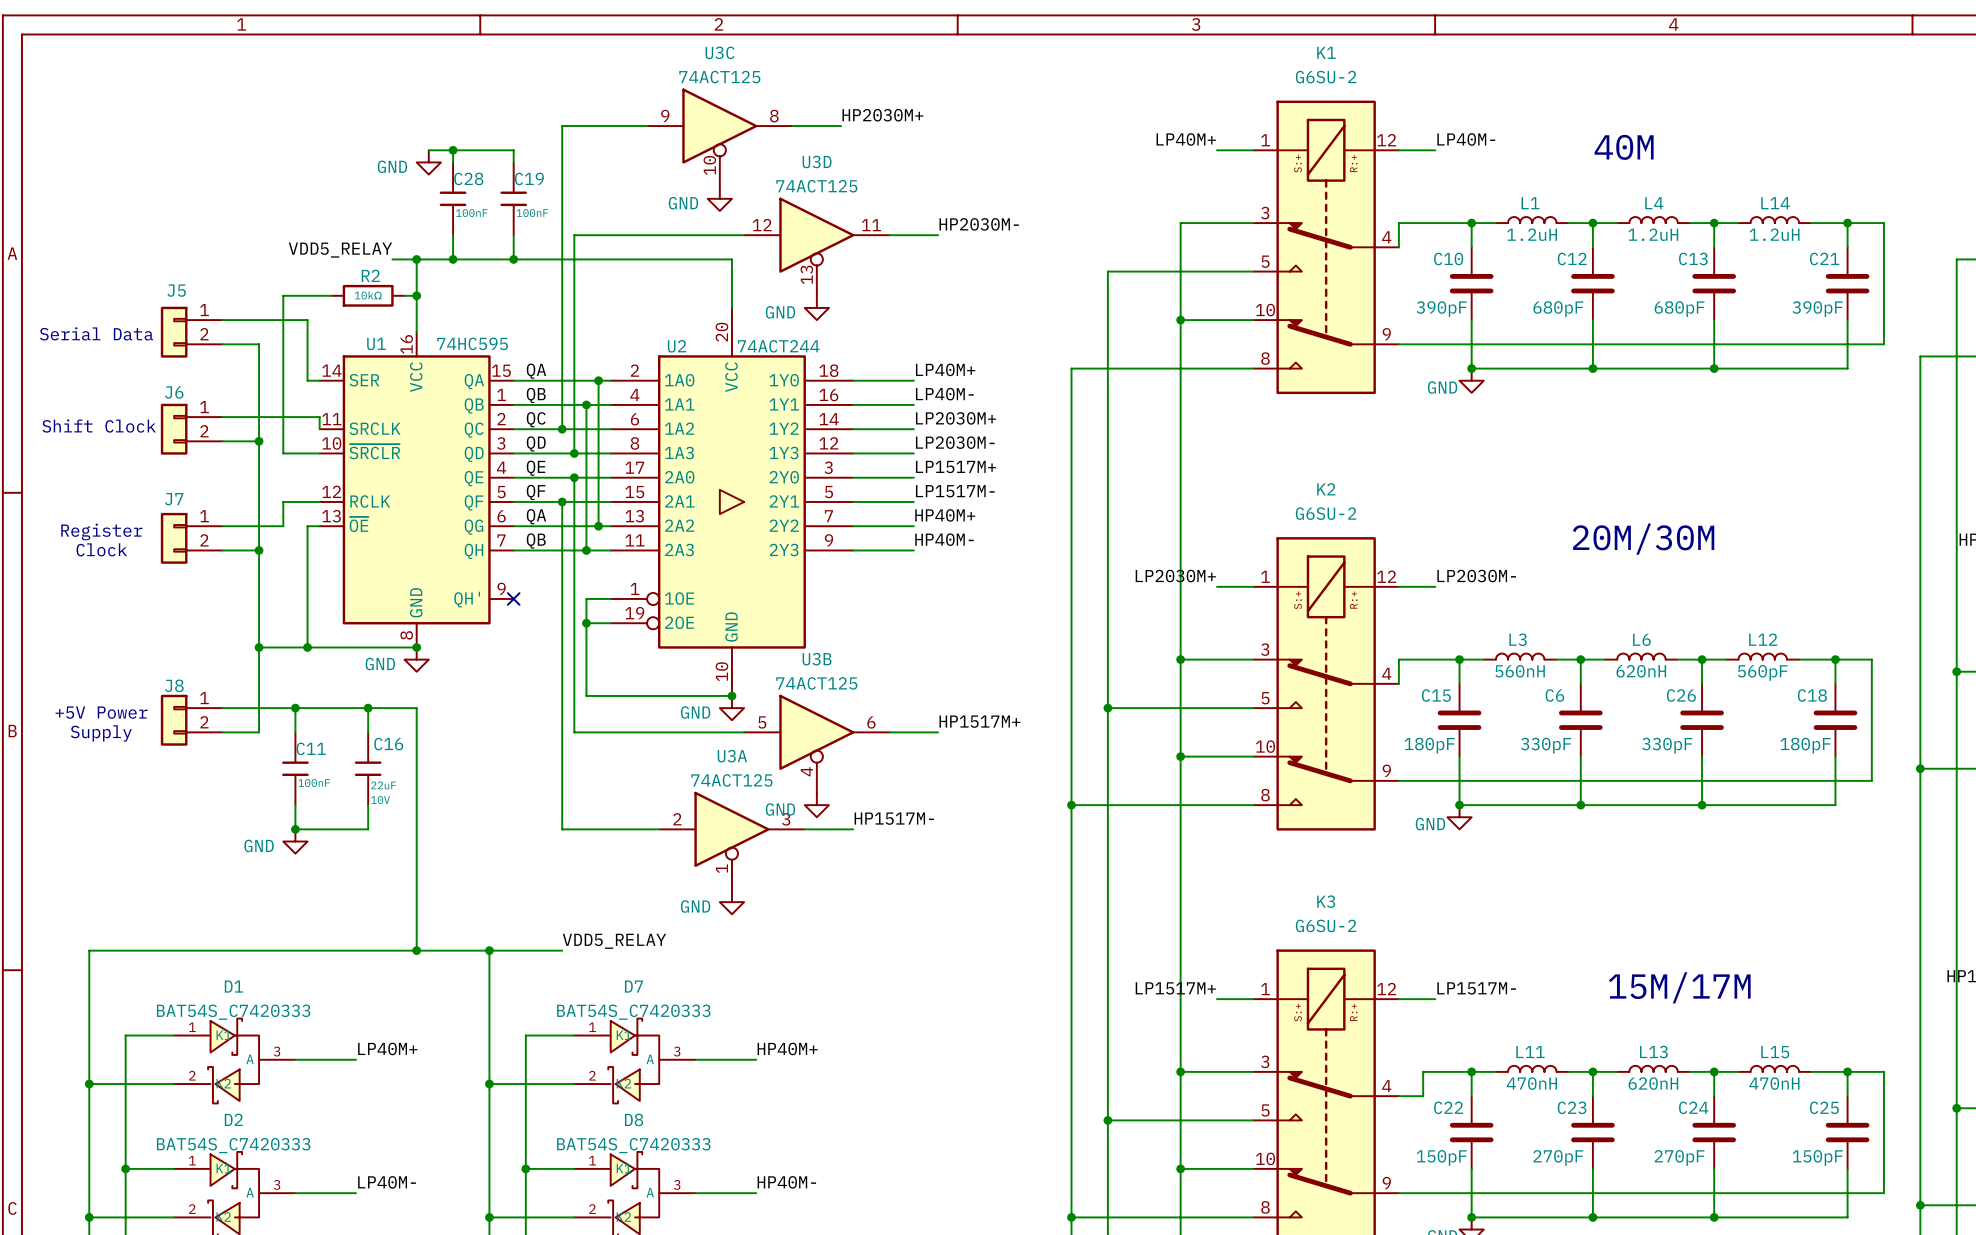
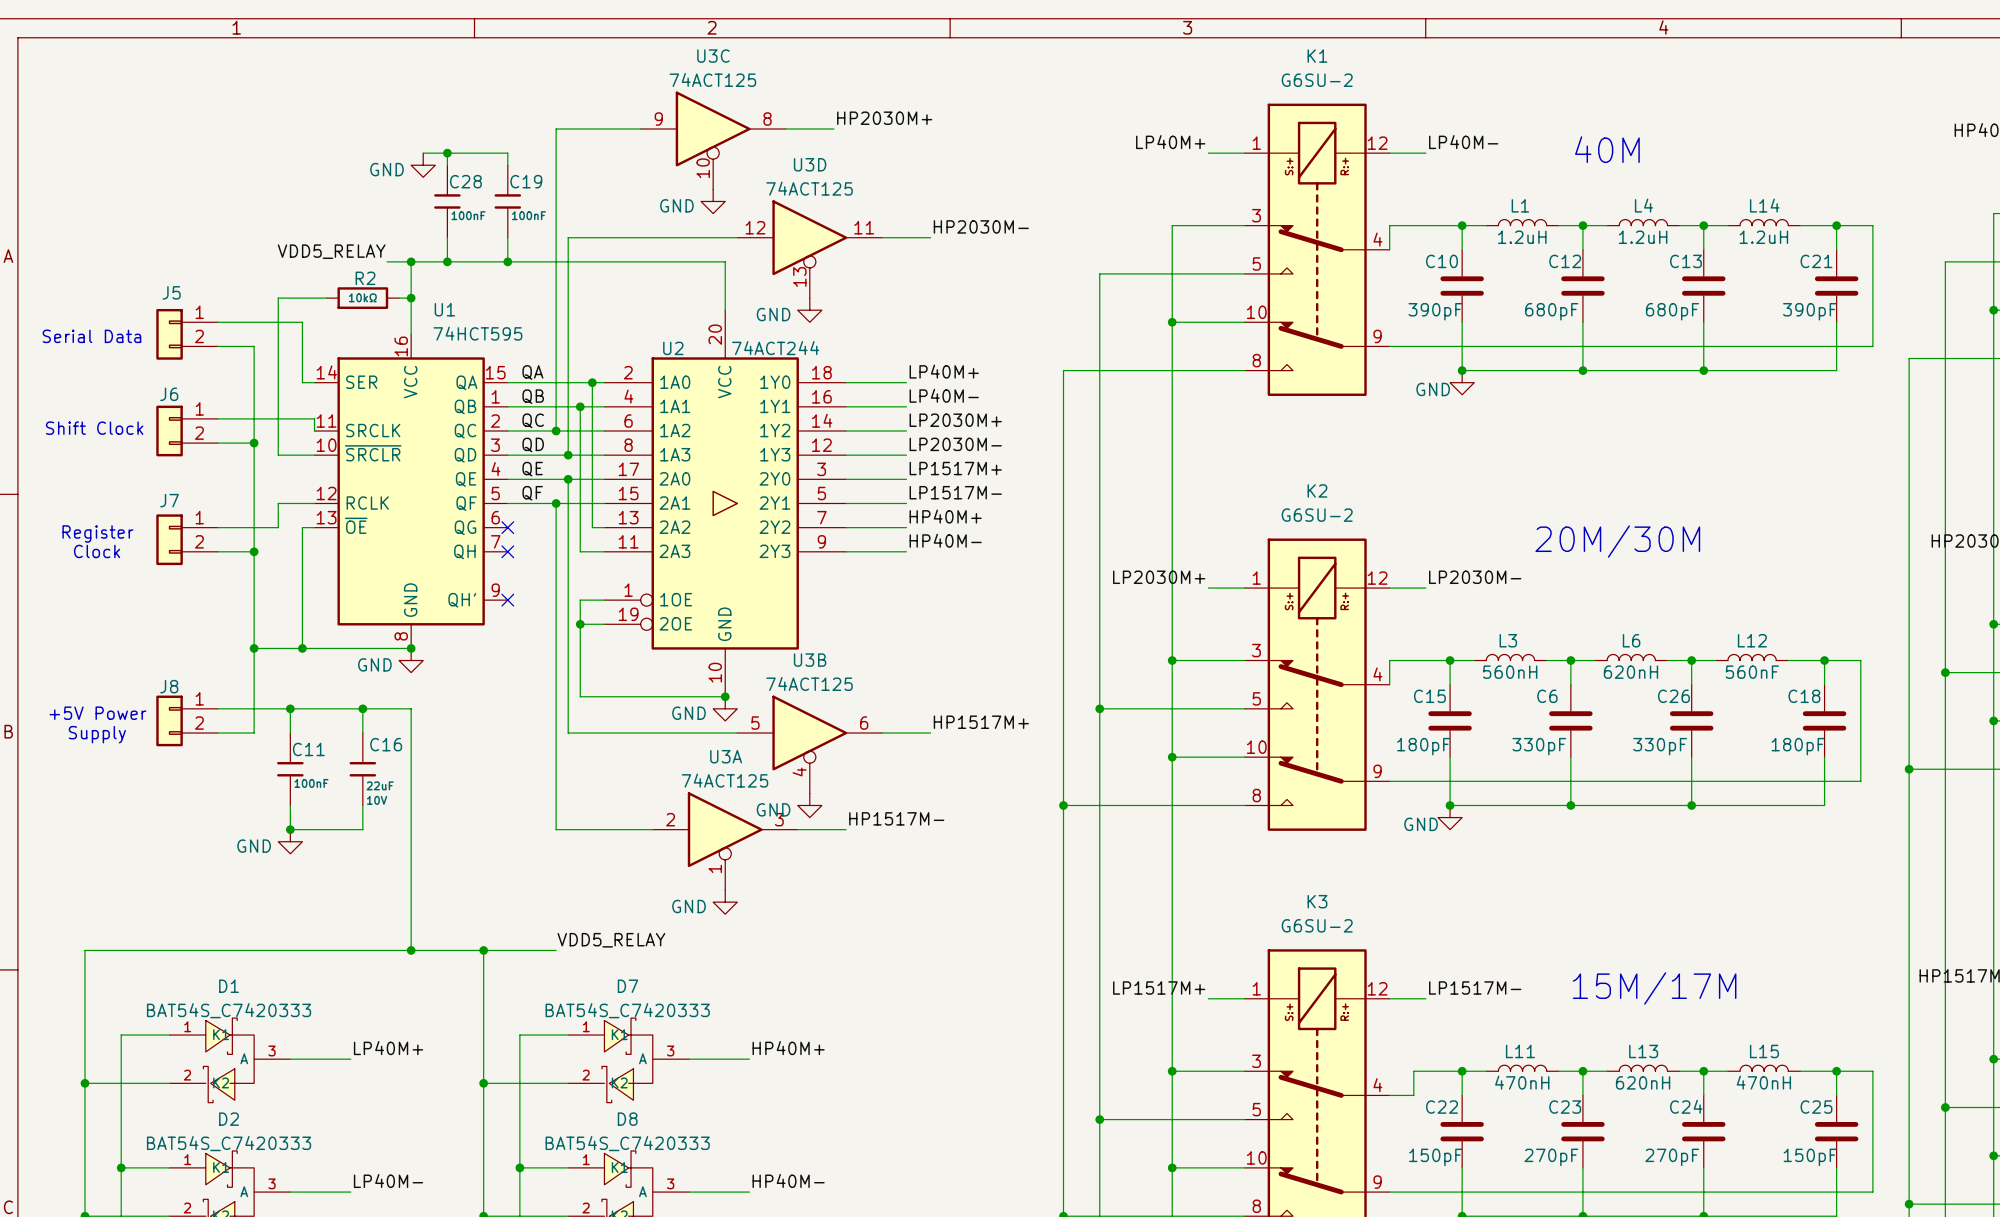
U1 name position: U1 (376, 343) -> U1 (444, 309)
U1 value: 74HC595 (472, 343) -> 74HCT595 (477, 333)
label: QA (536, 516) -> none
wire: (513, 526) (598, 526) -> none
no-connect mark: none -> (507, 527)
junction: (598, 526) -> none
label: QB (536, 540) -> none
wire: (513, 550) (586, 550) -> none
no-connect mark: none -> (507, 551)
junction: (586, 550) -> none
L12 value: 560pF (1762, 672) -> 560nF (1752, 672)

